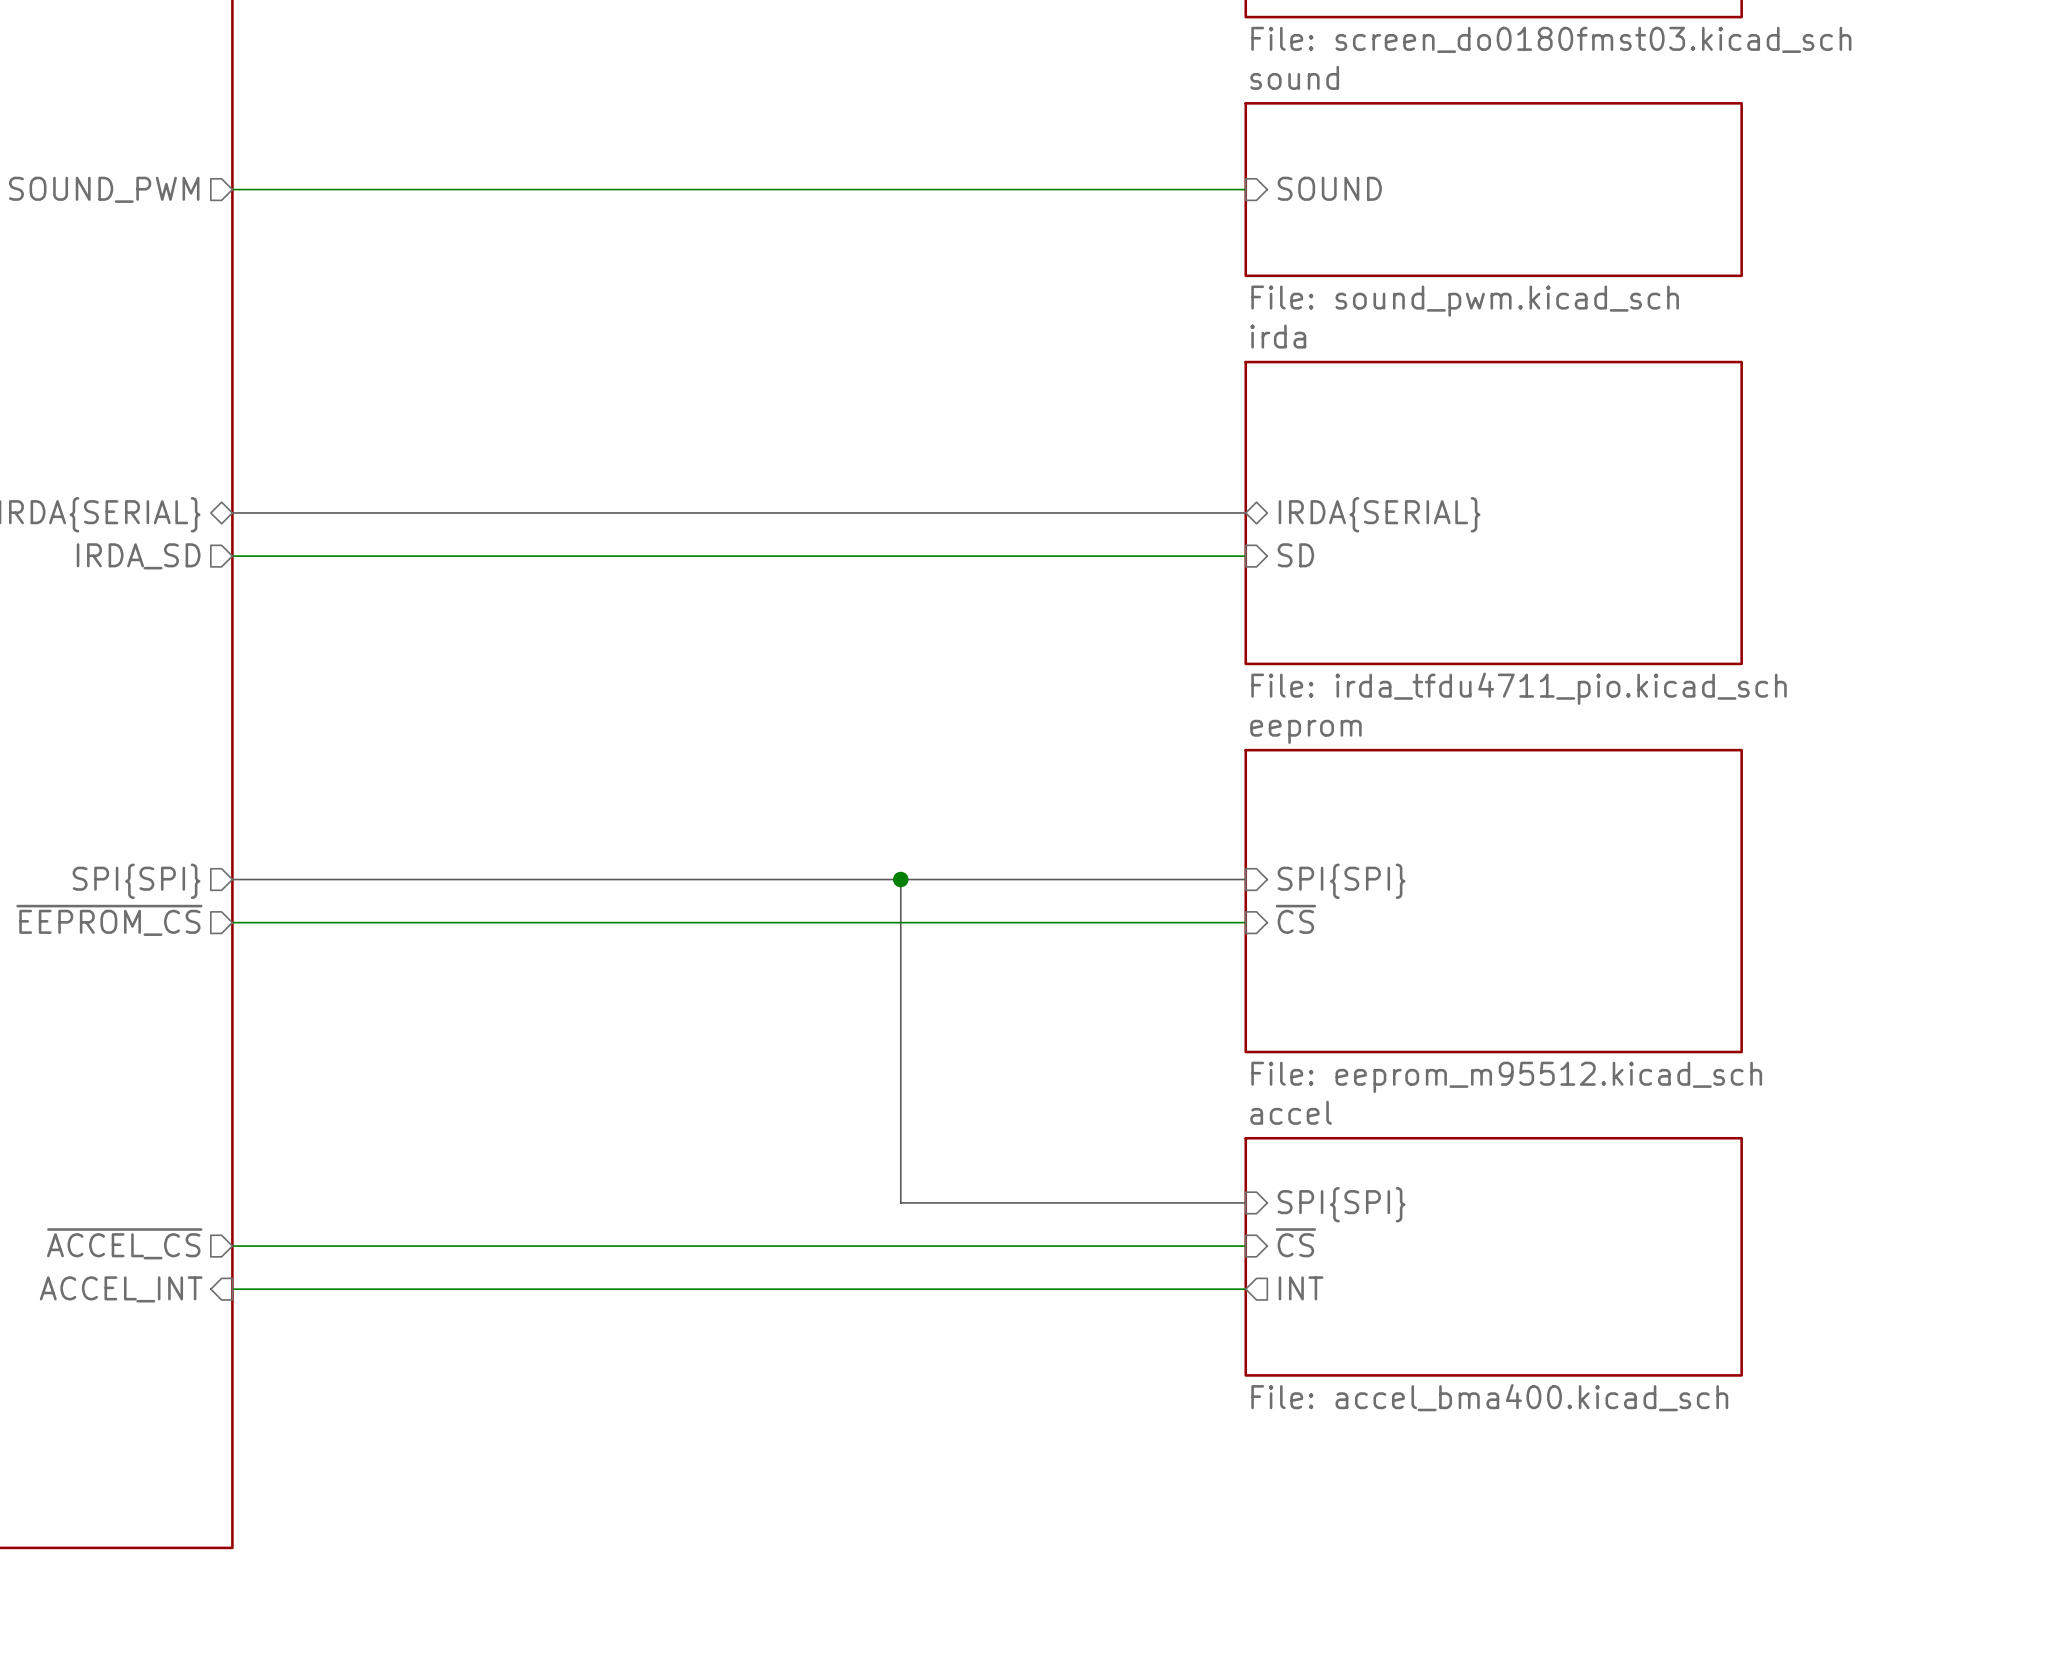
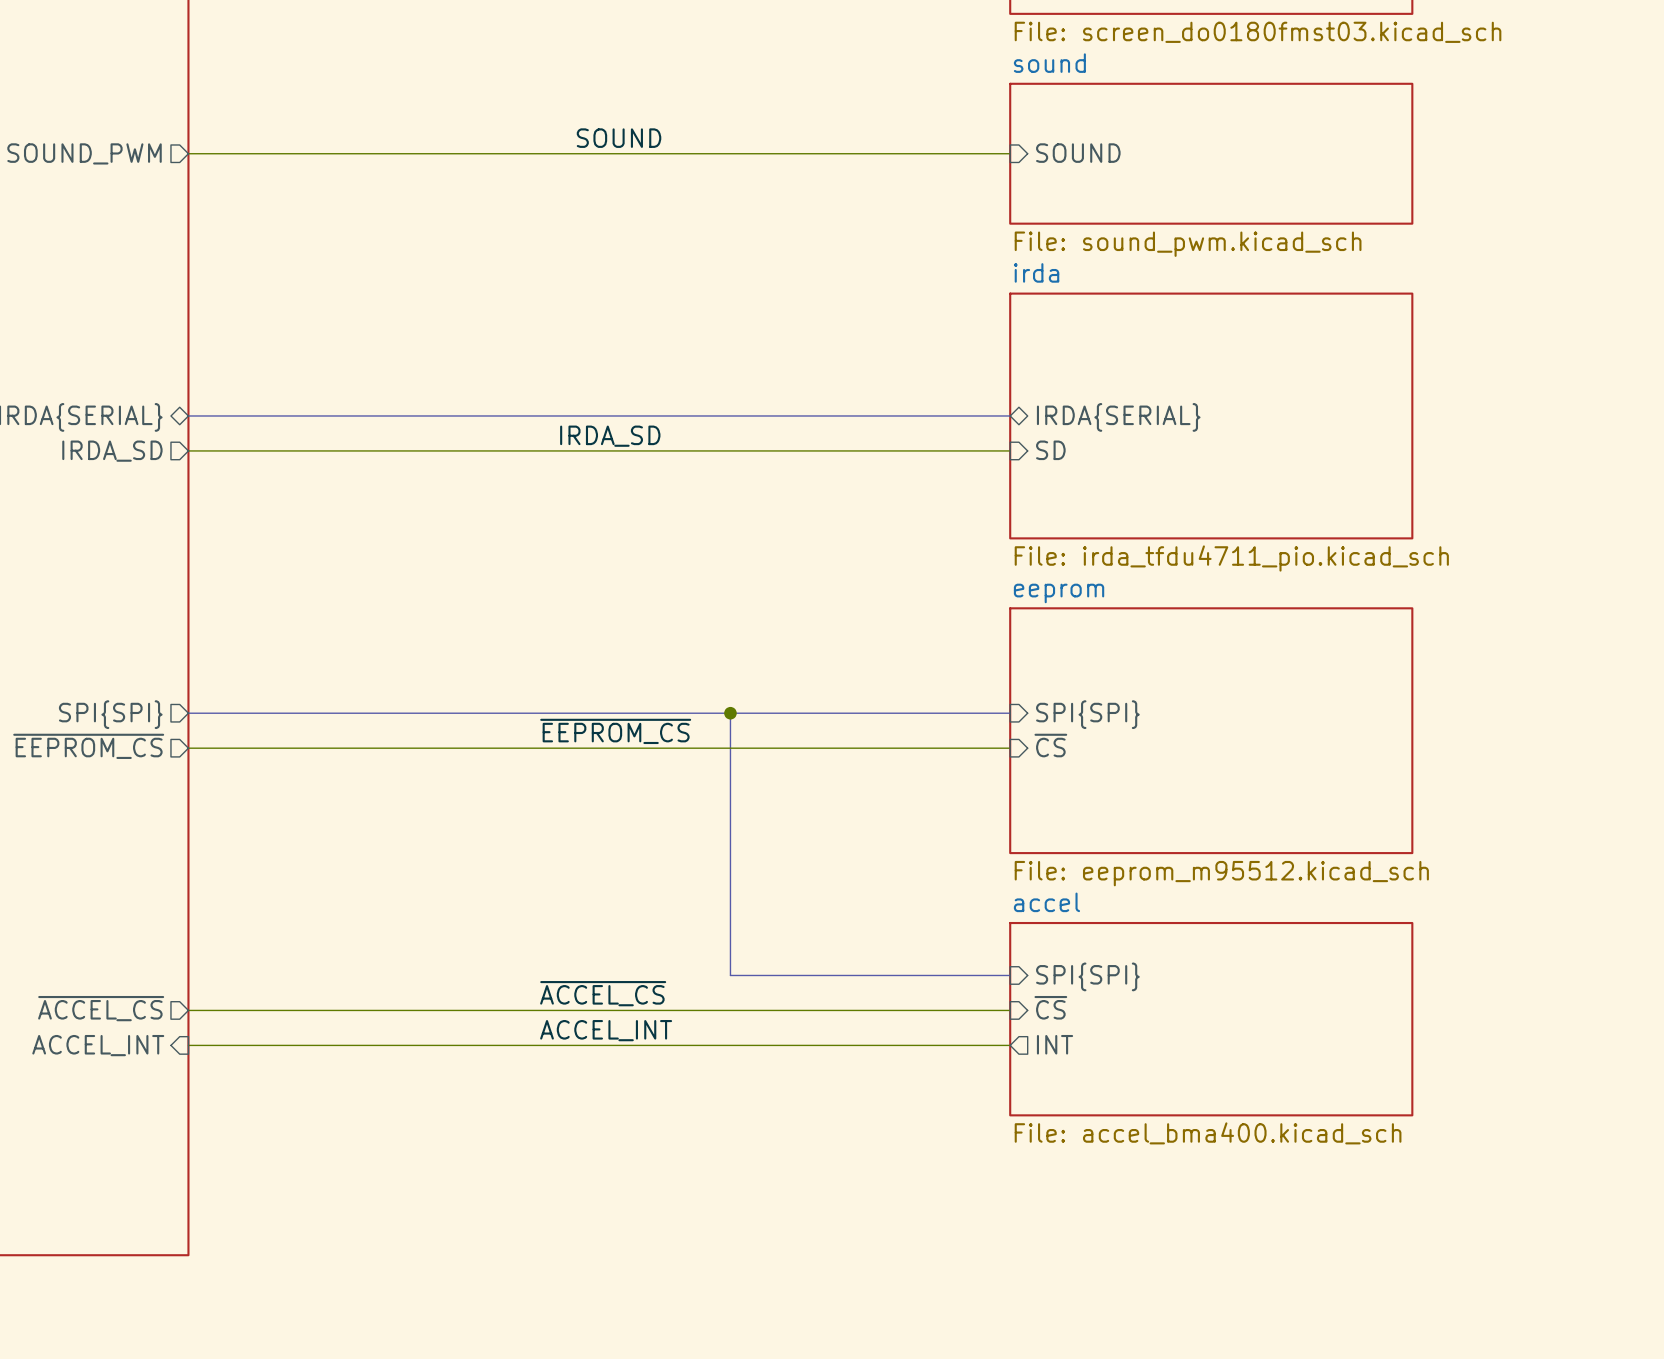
label: none -> SOUND (619, 138)
label: none -> IRDA_SD (610, 436)
label: none -> ~{EEPROM_CS} (615, 731)
label: none -> ~{ACCEL_CS} (603, 993)
label: none -> ACCEL_INT (606, 1030)

